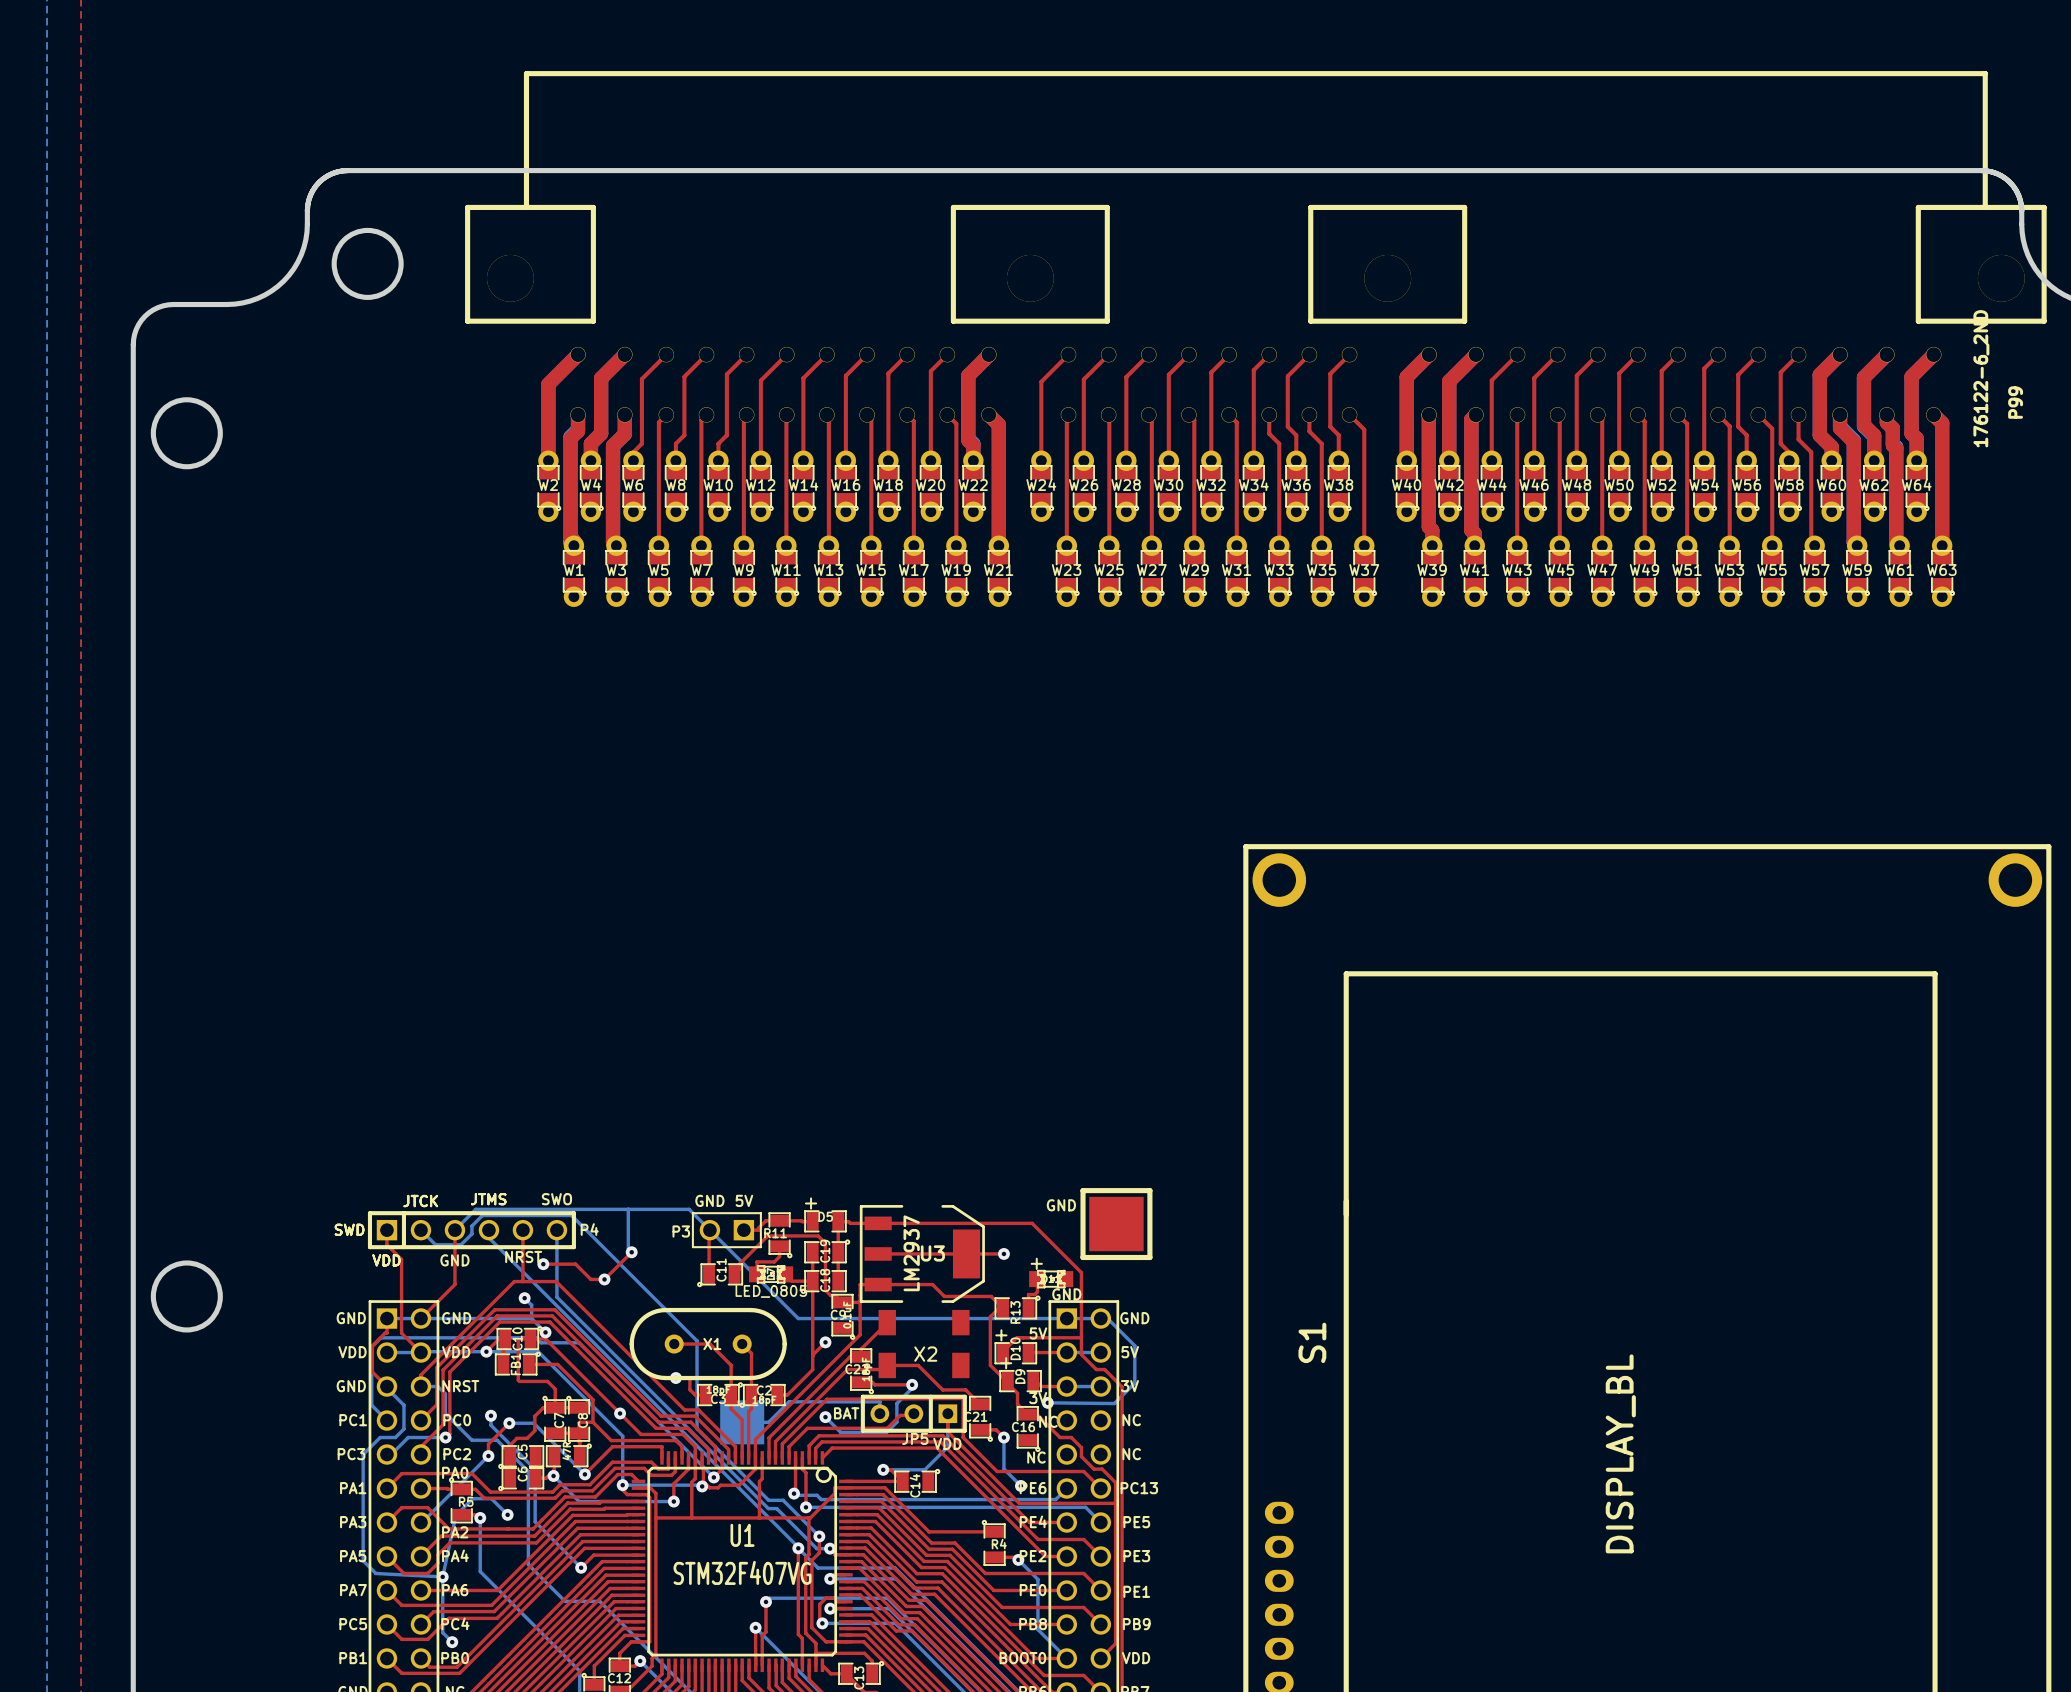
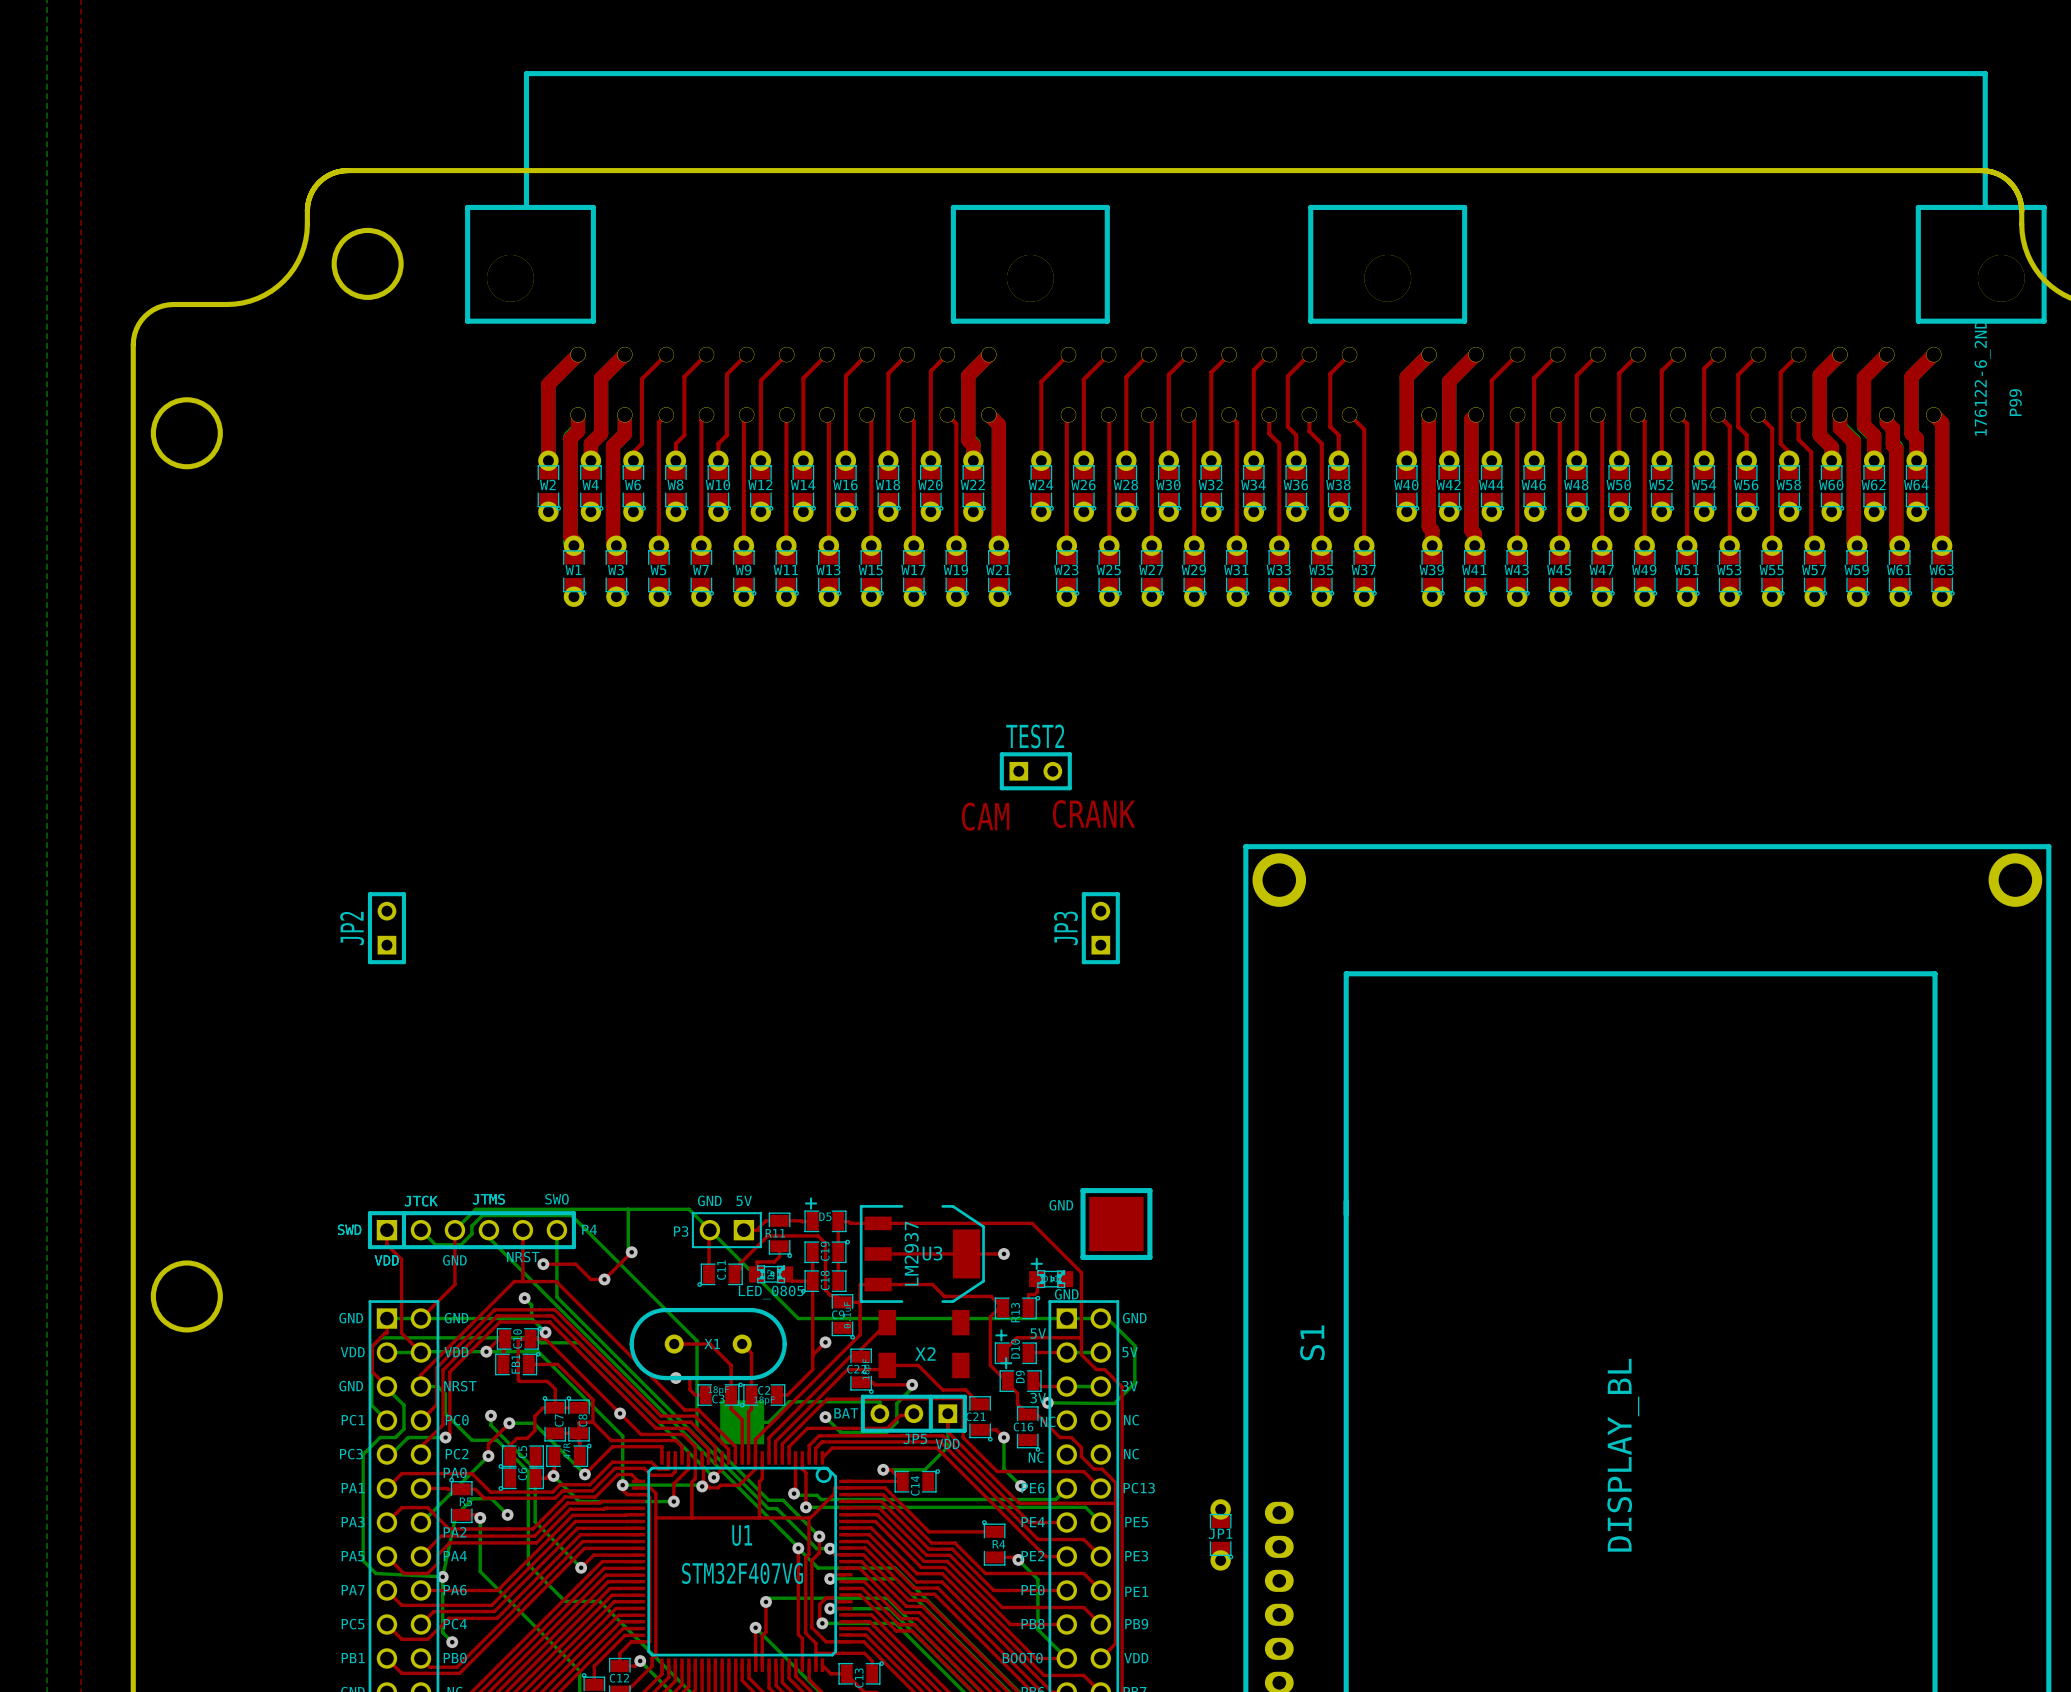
TEST2: none -> (1035, 771)
text: none -> CRANK (1094, 814)
text: none -> CAM (985, 816)
JP2: none -> (386, 928)
JP3: none -> (1100, 928)
JP1: none -> (1221, 1534)

